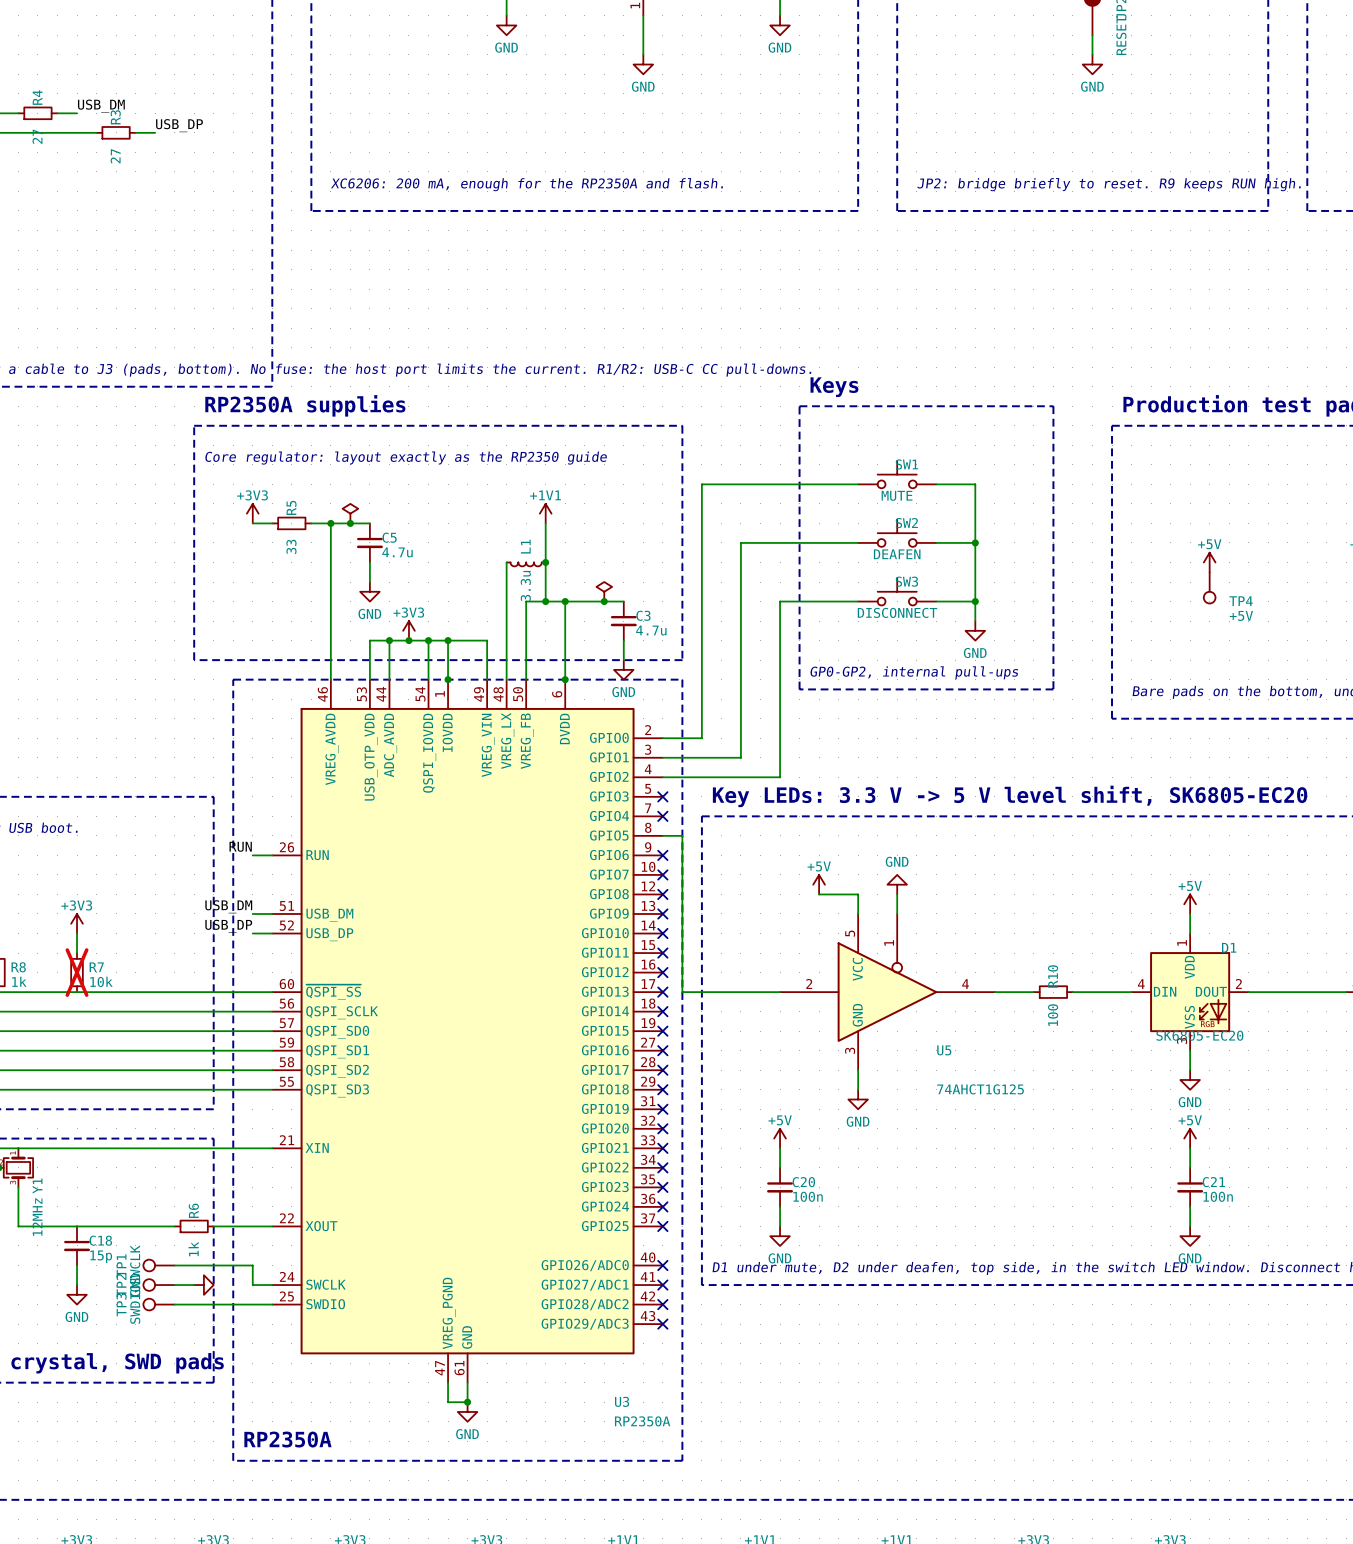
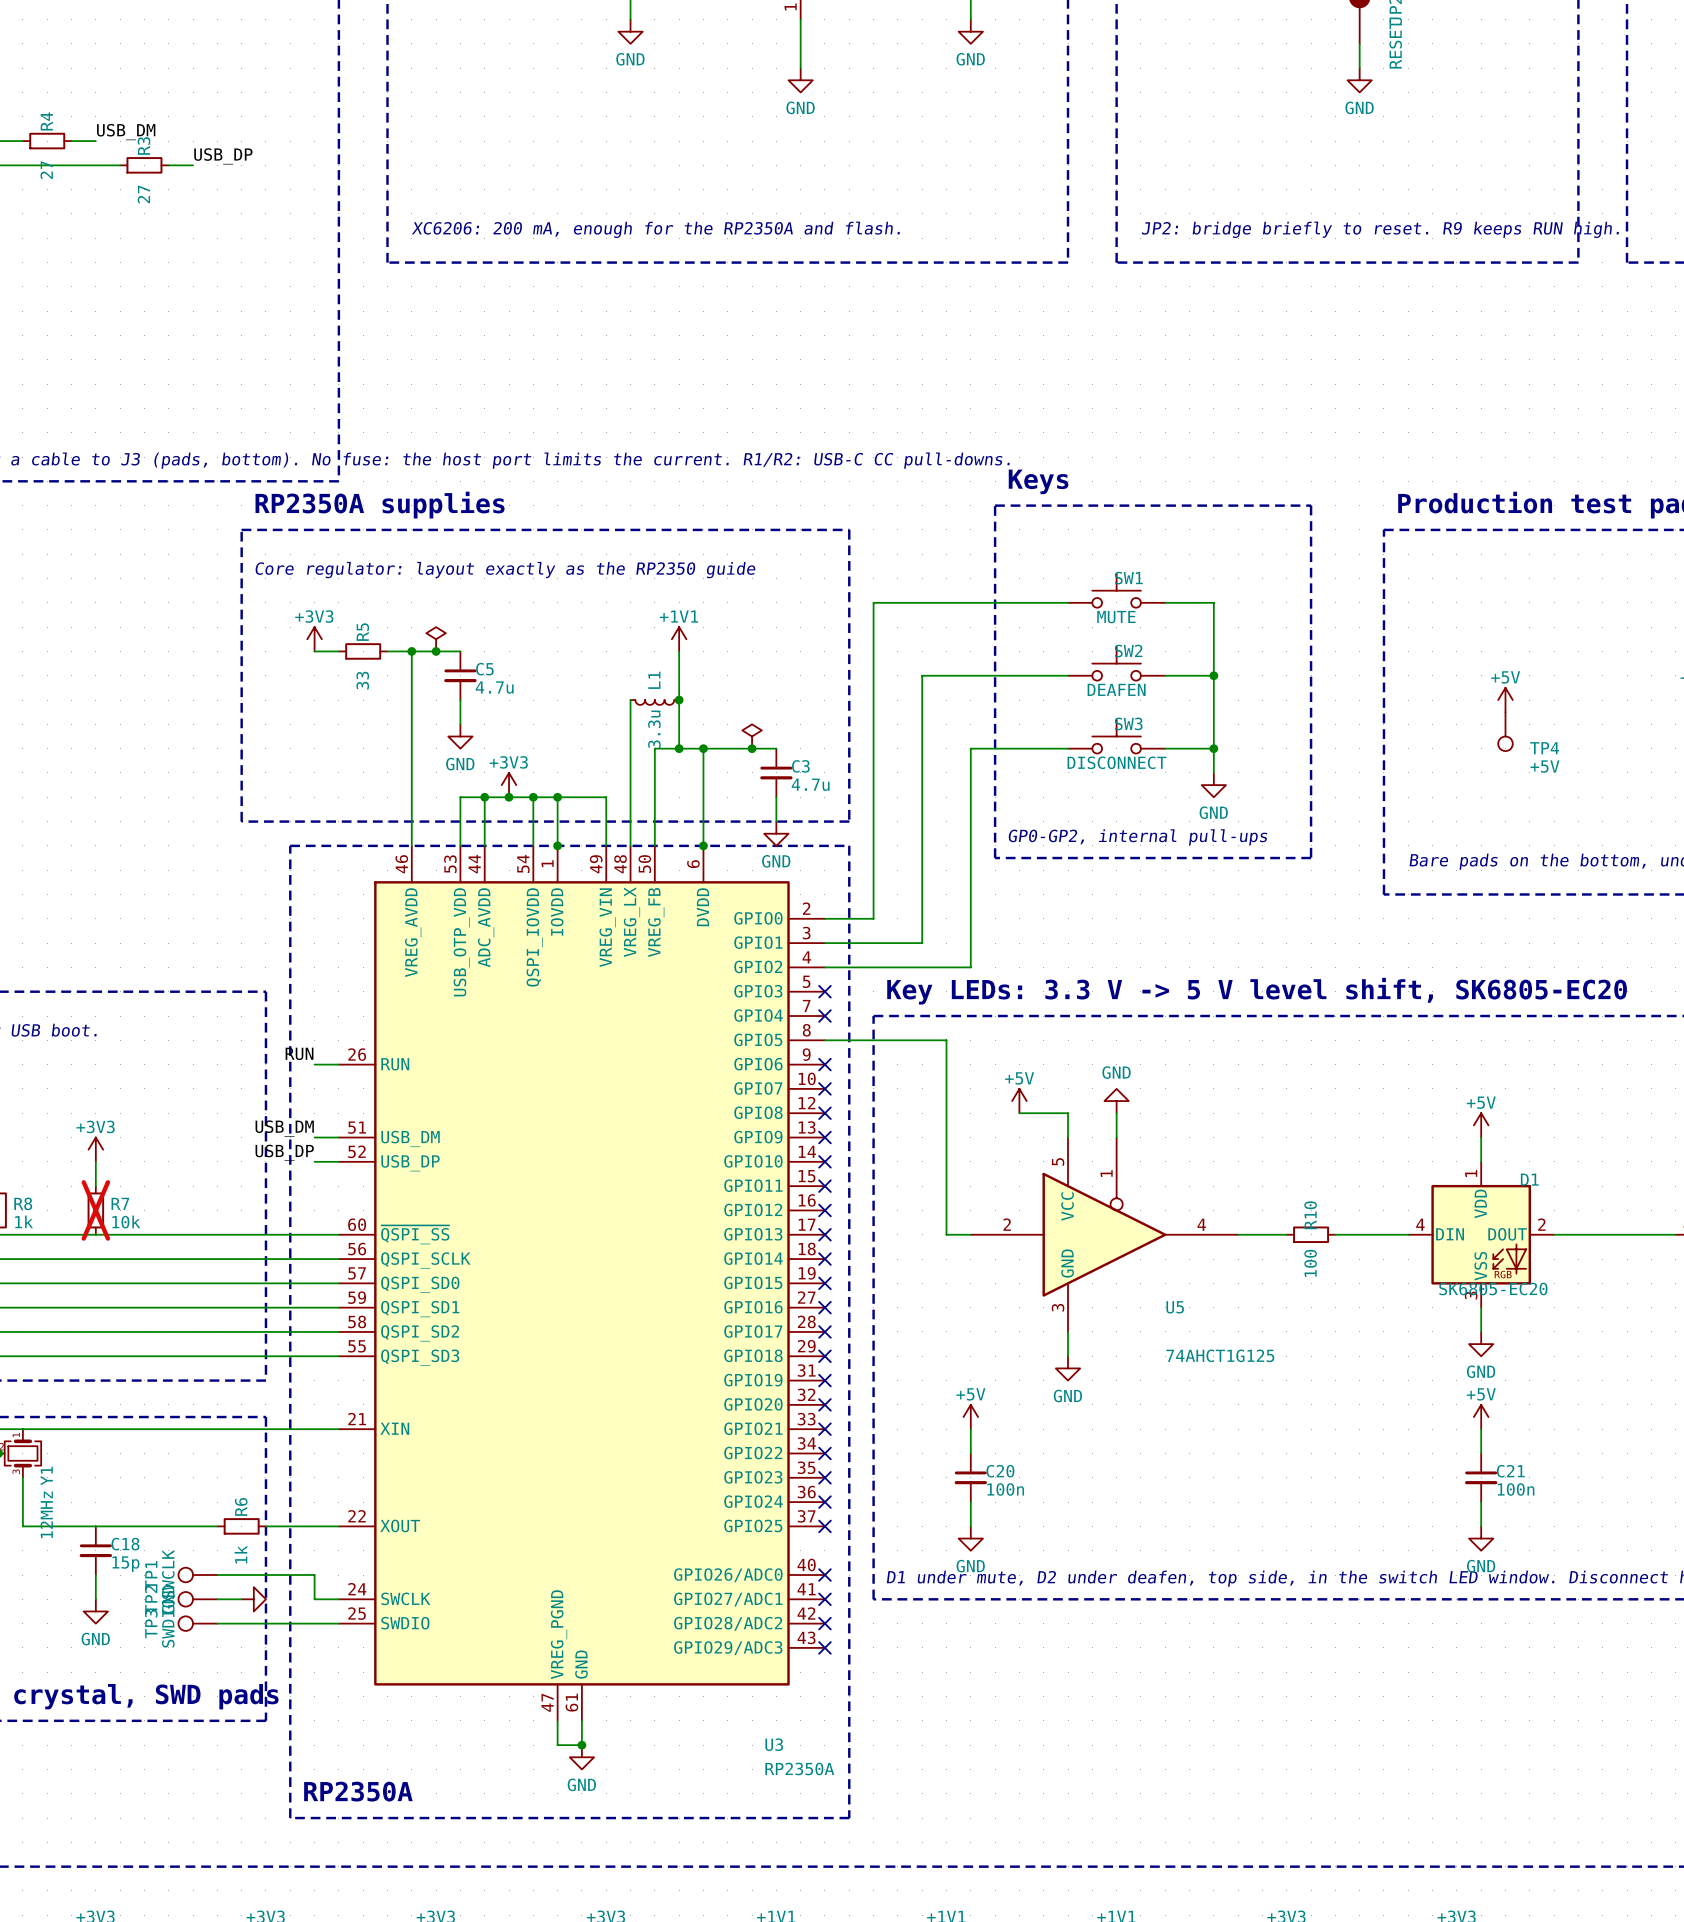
wire: (682, 835) (682, 992) (760, 992) -> (849, 1040) (946, 1040) (946, 1234)

